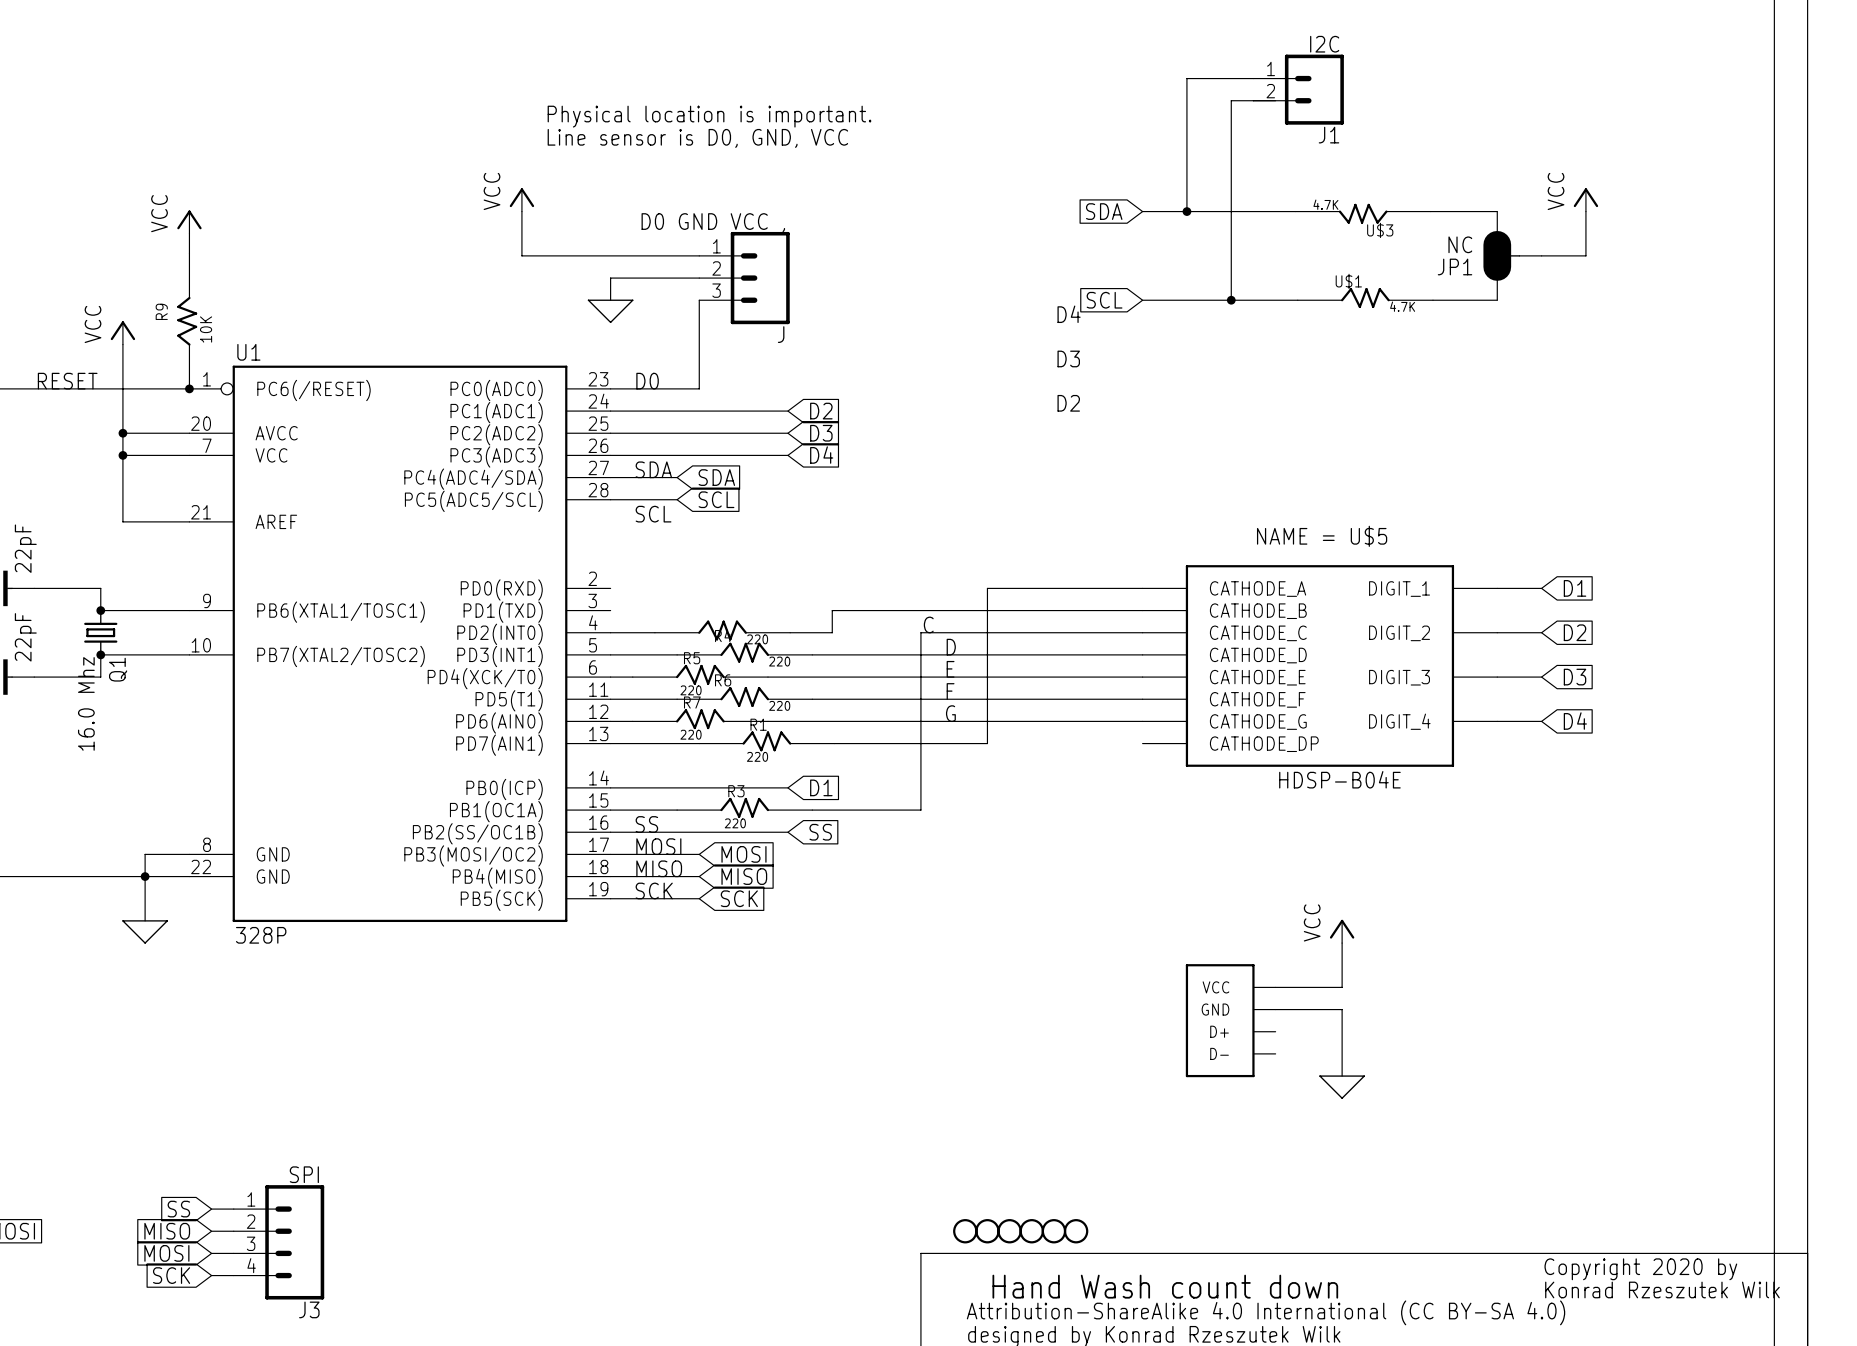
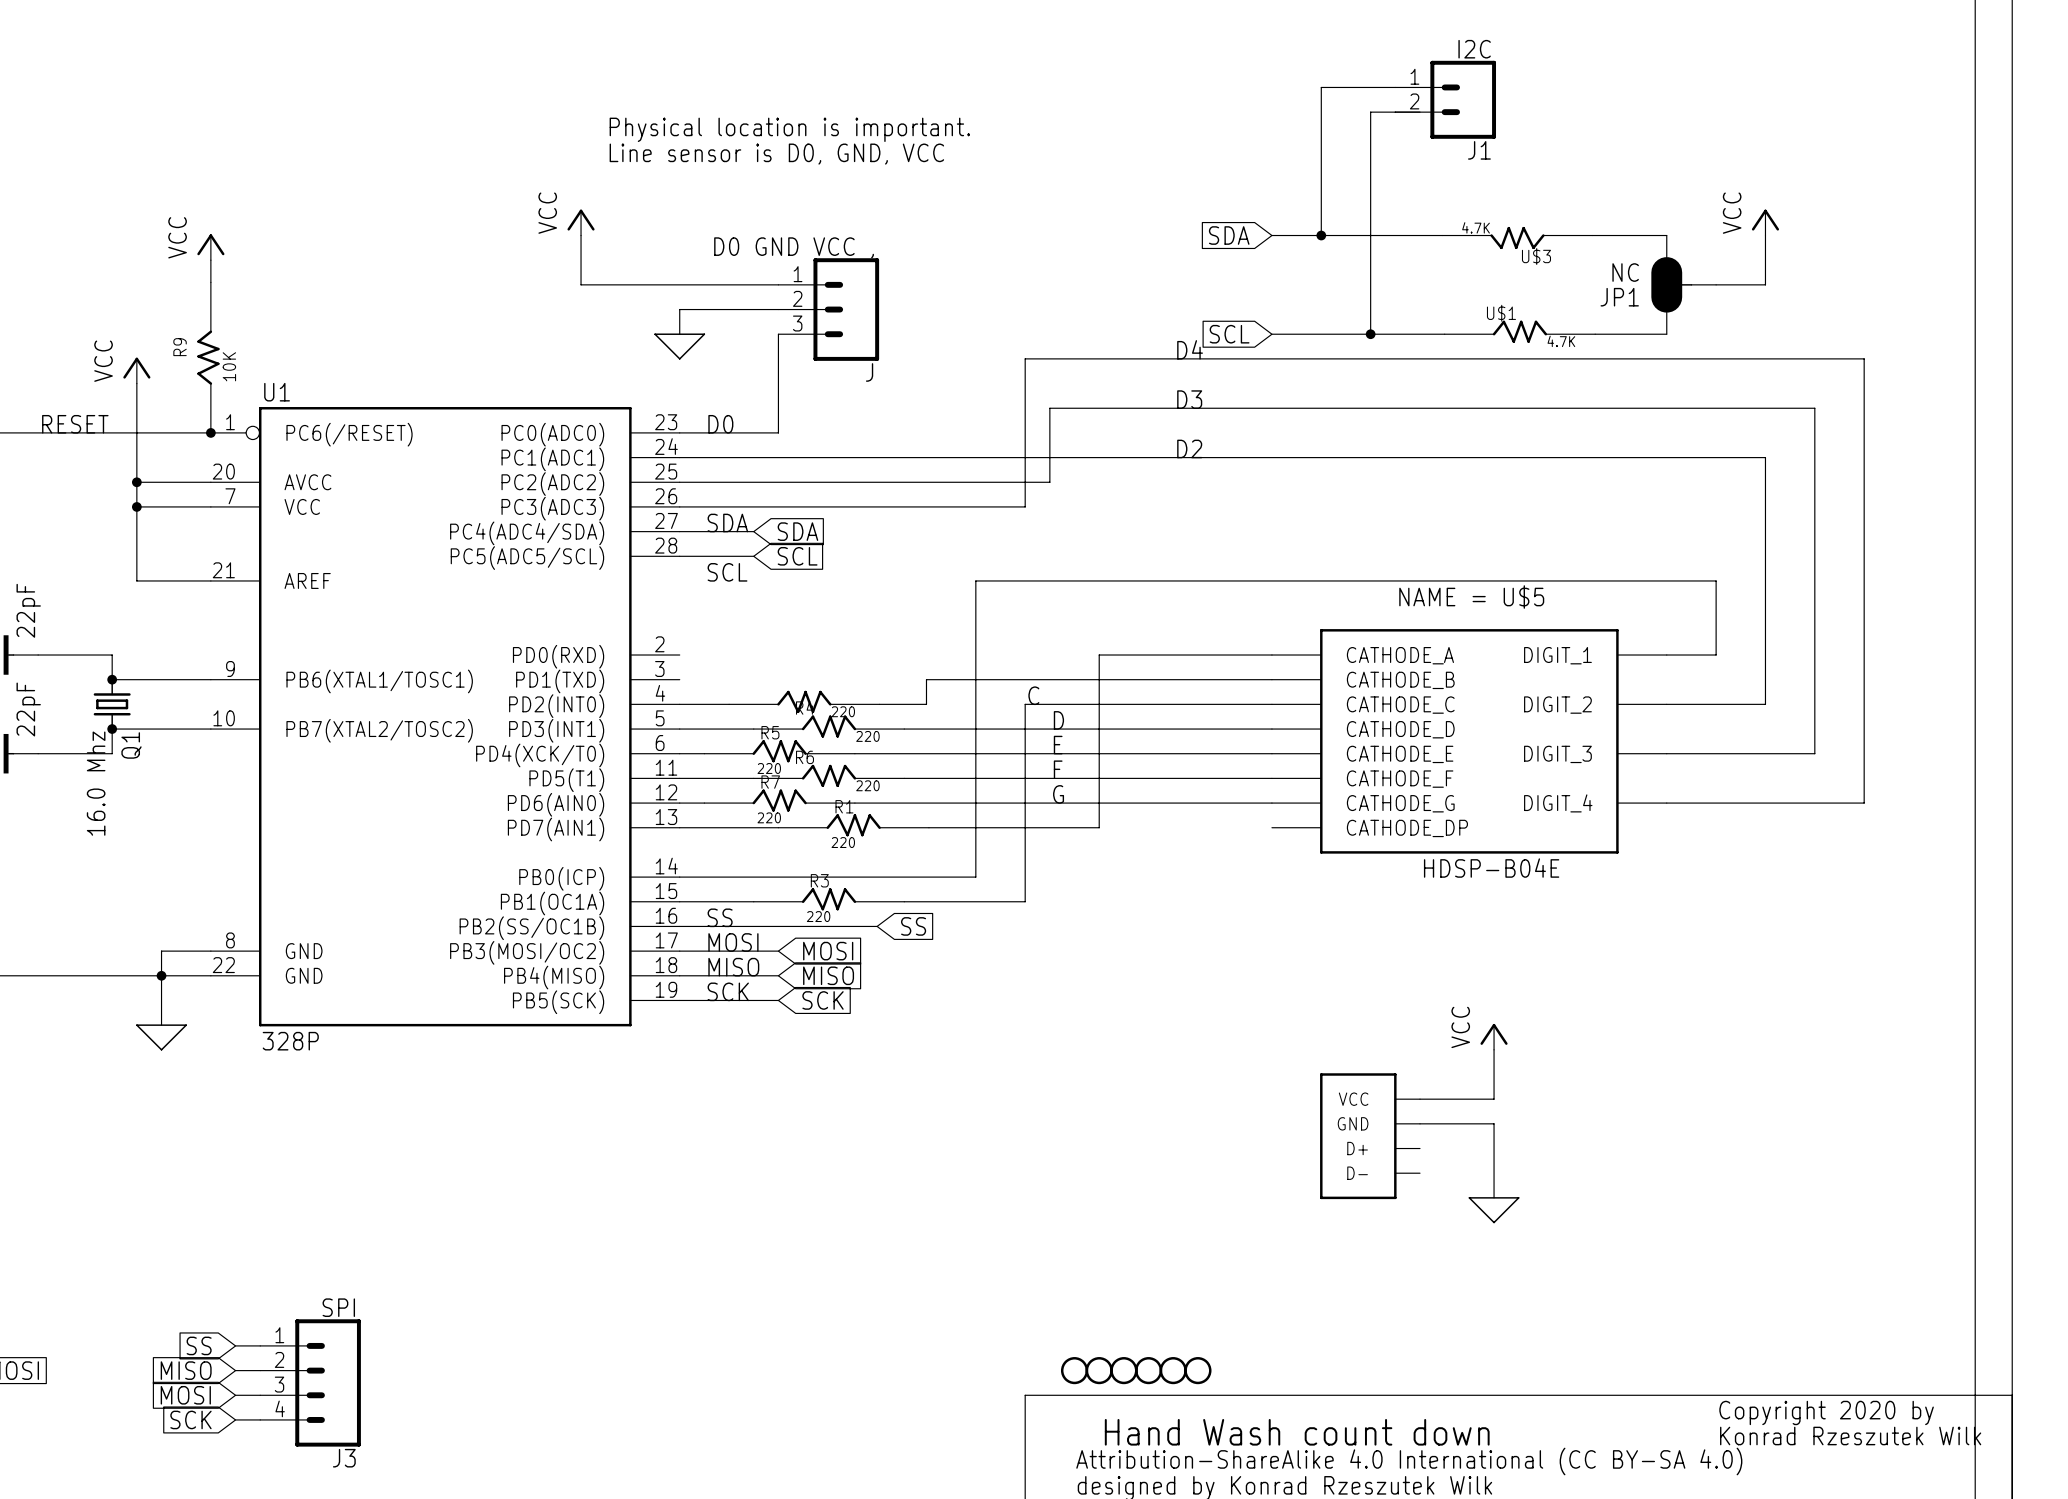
wire: none -> (877, 457) (1765, 457) (1765, 704) (1716, 704)
global label: D2 (821, 411) -> none
wire: none -> (877, 482) (1049, 482) (1049, 408) (1814, 408) (1814, 753) (1716, 753)
global label: D3 (821, 433) -> none
wire: none -> (877, 506) (1025, 506) (1025, 358) (1864, 358) (1864, 803) (1716, 803)
global label: D4 (821, 455) -> none
wire: none -> (1716, 655) (1716, 580) (975, 580) (975, 877) (877, 877)
global label: D1 (1575, 588) -> none
global label: D2 (1575, 632) -> none
global label: D3 (1575, 677) -> none
global label: D4 (1575, 721) -> none
global label: D1 (821, 787) -> none

